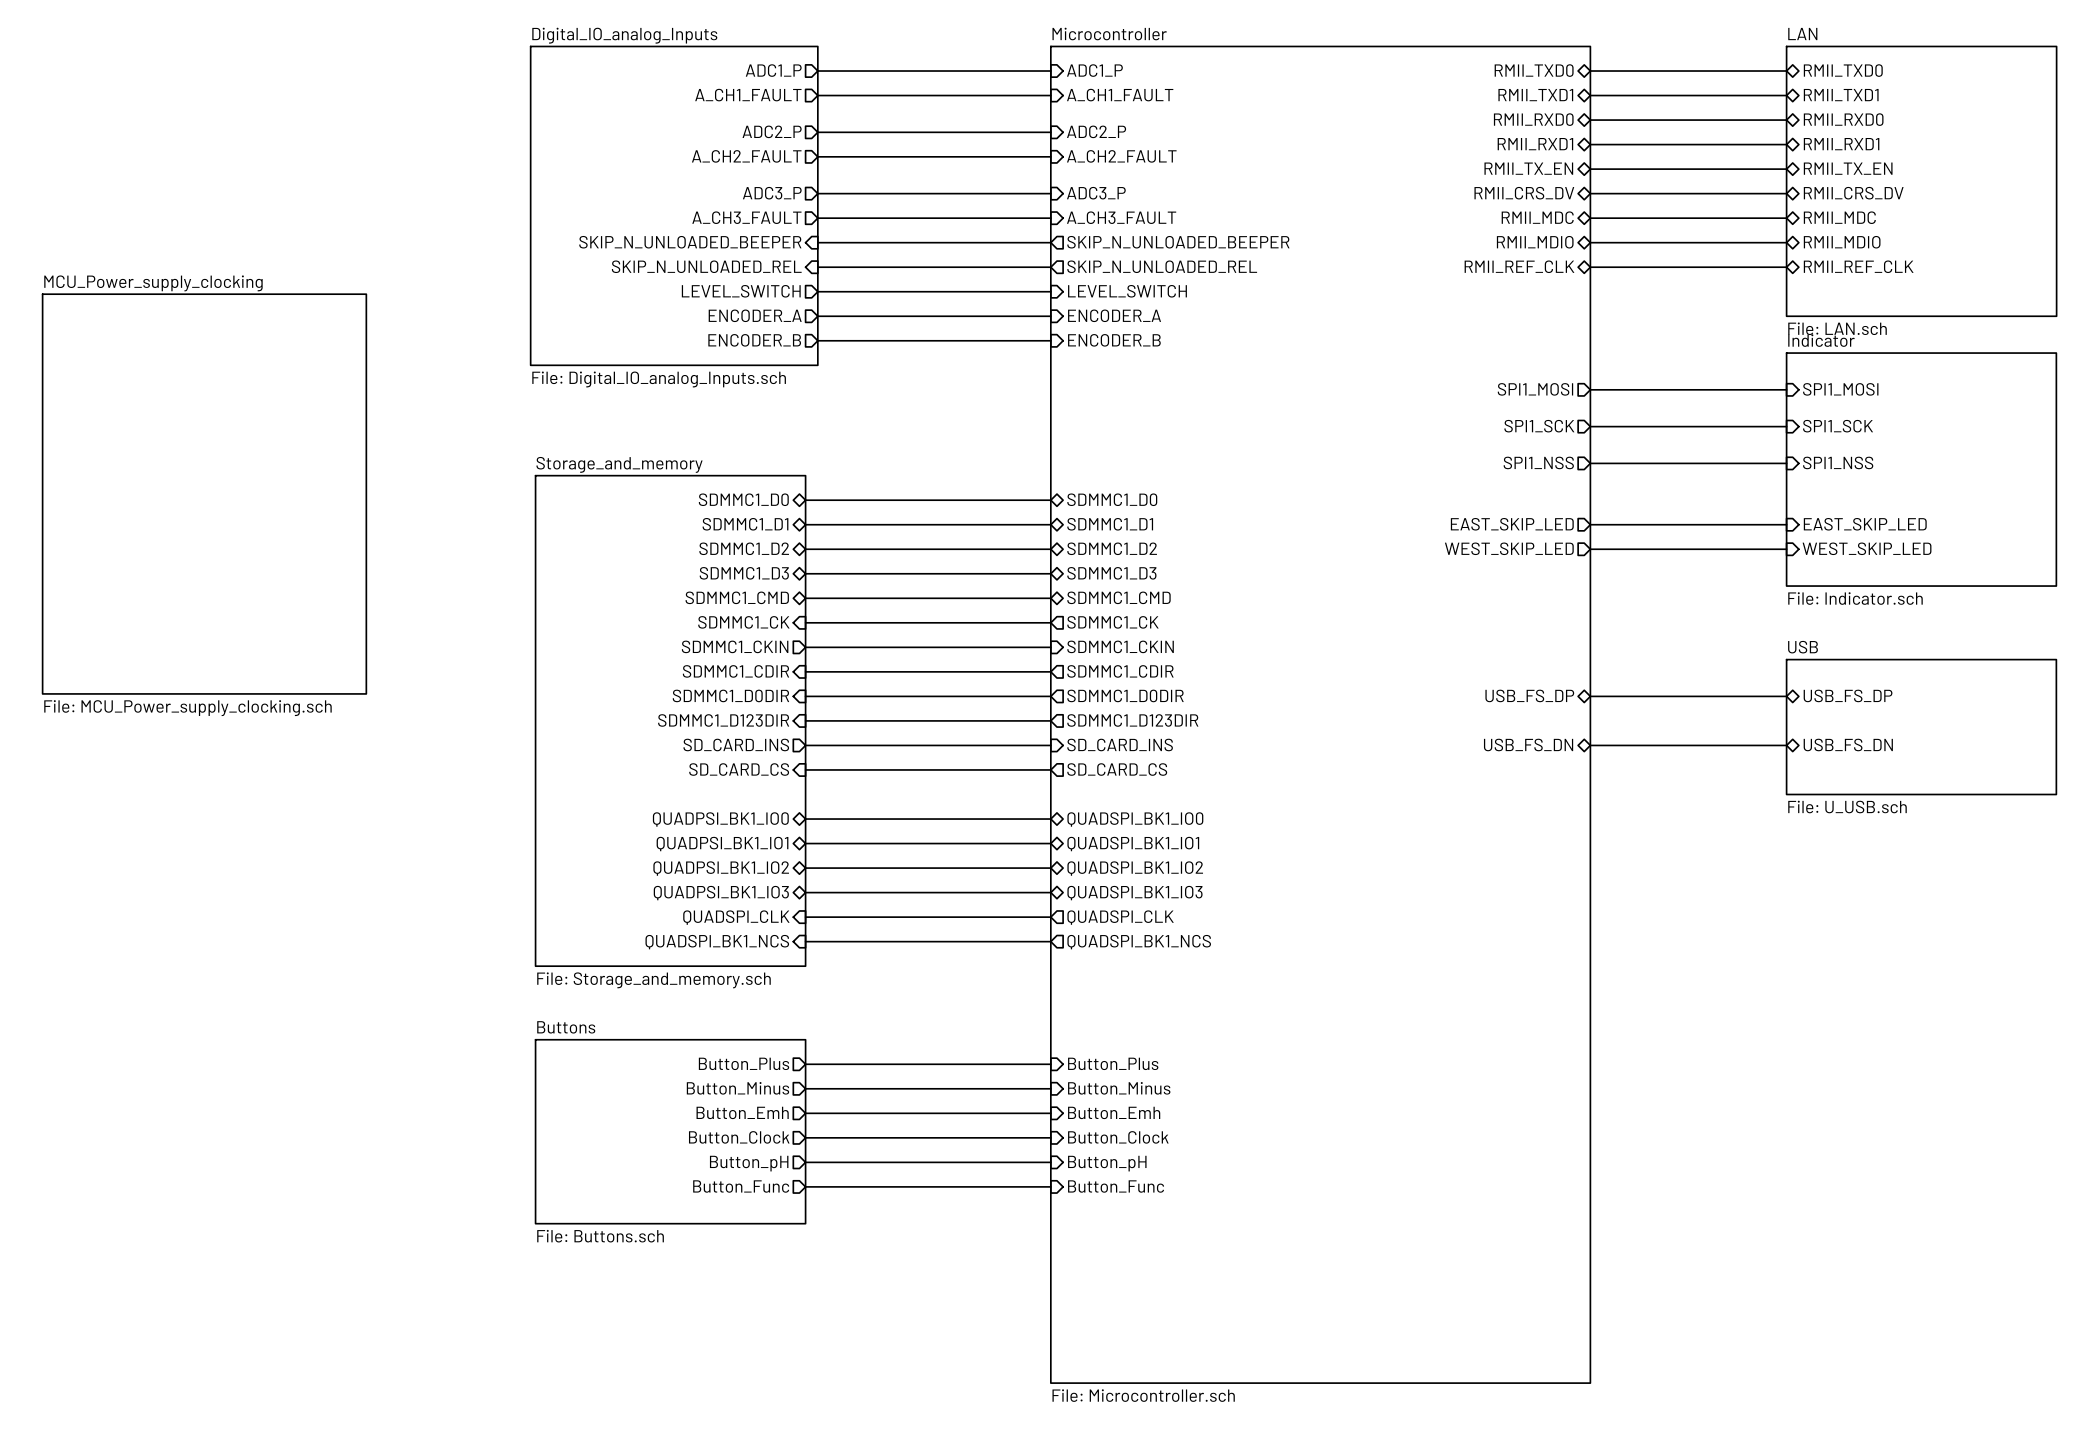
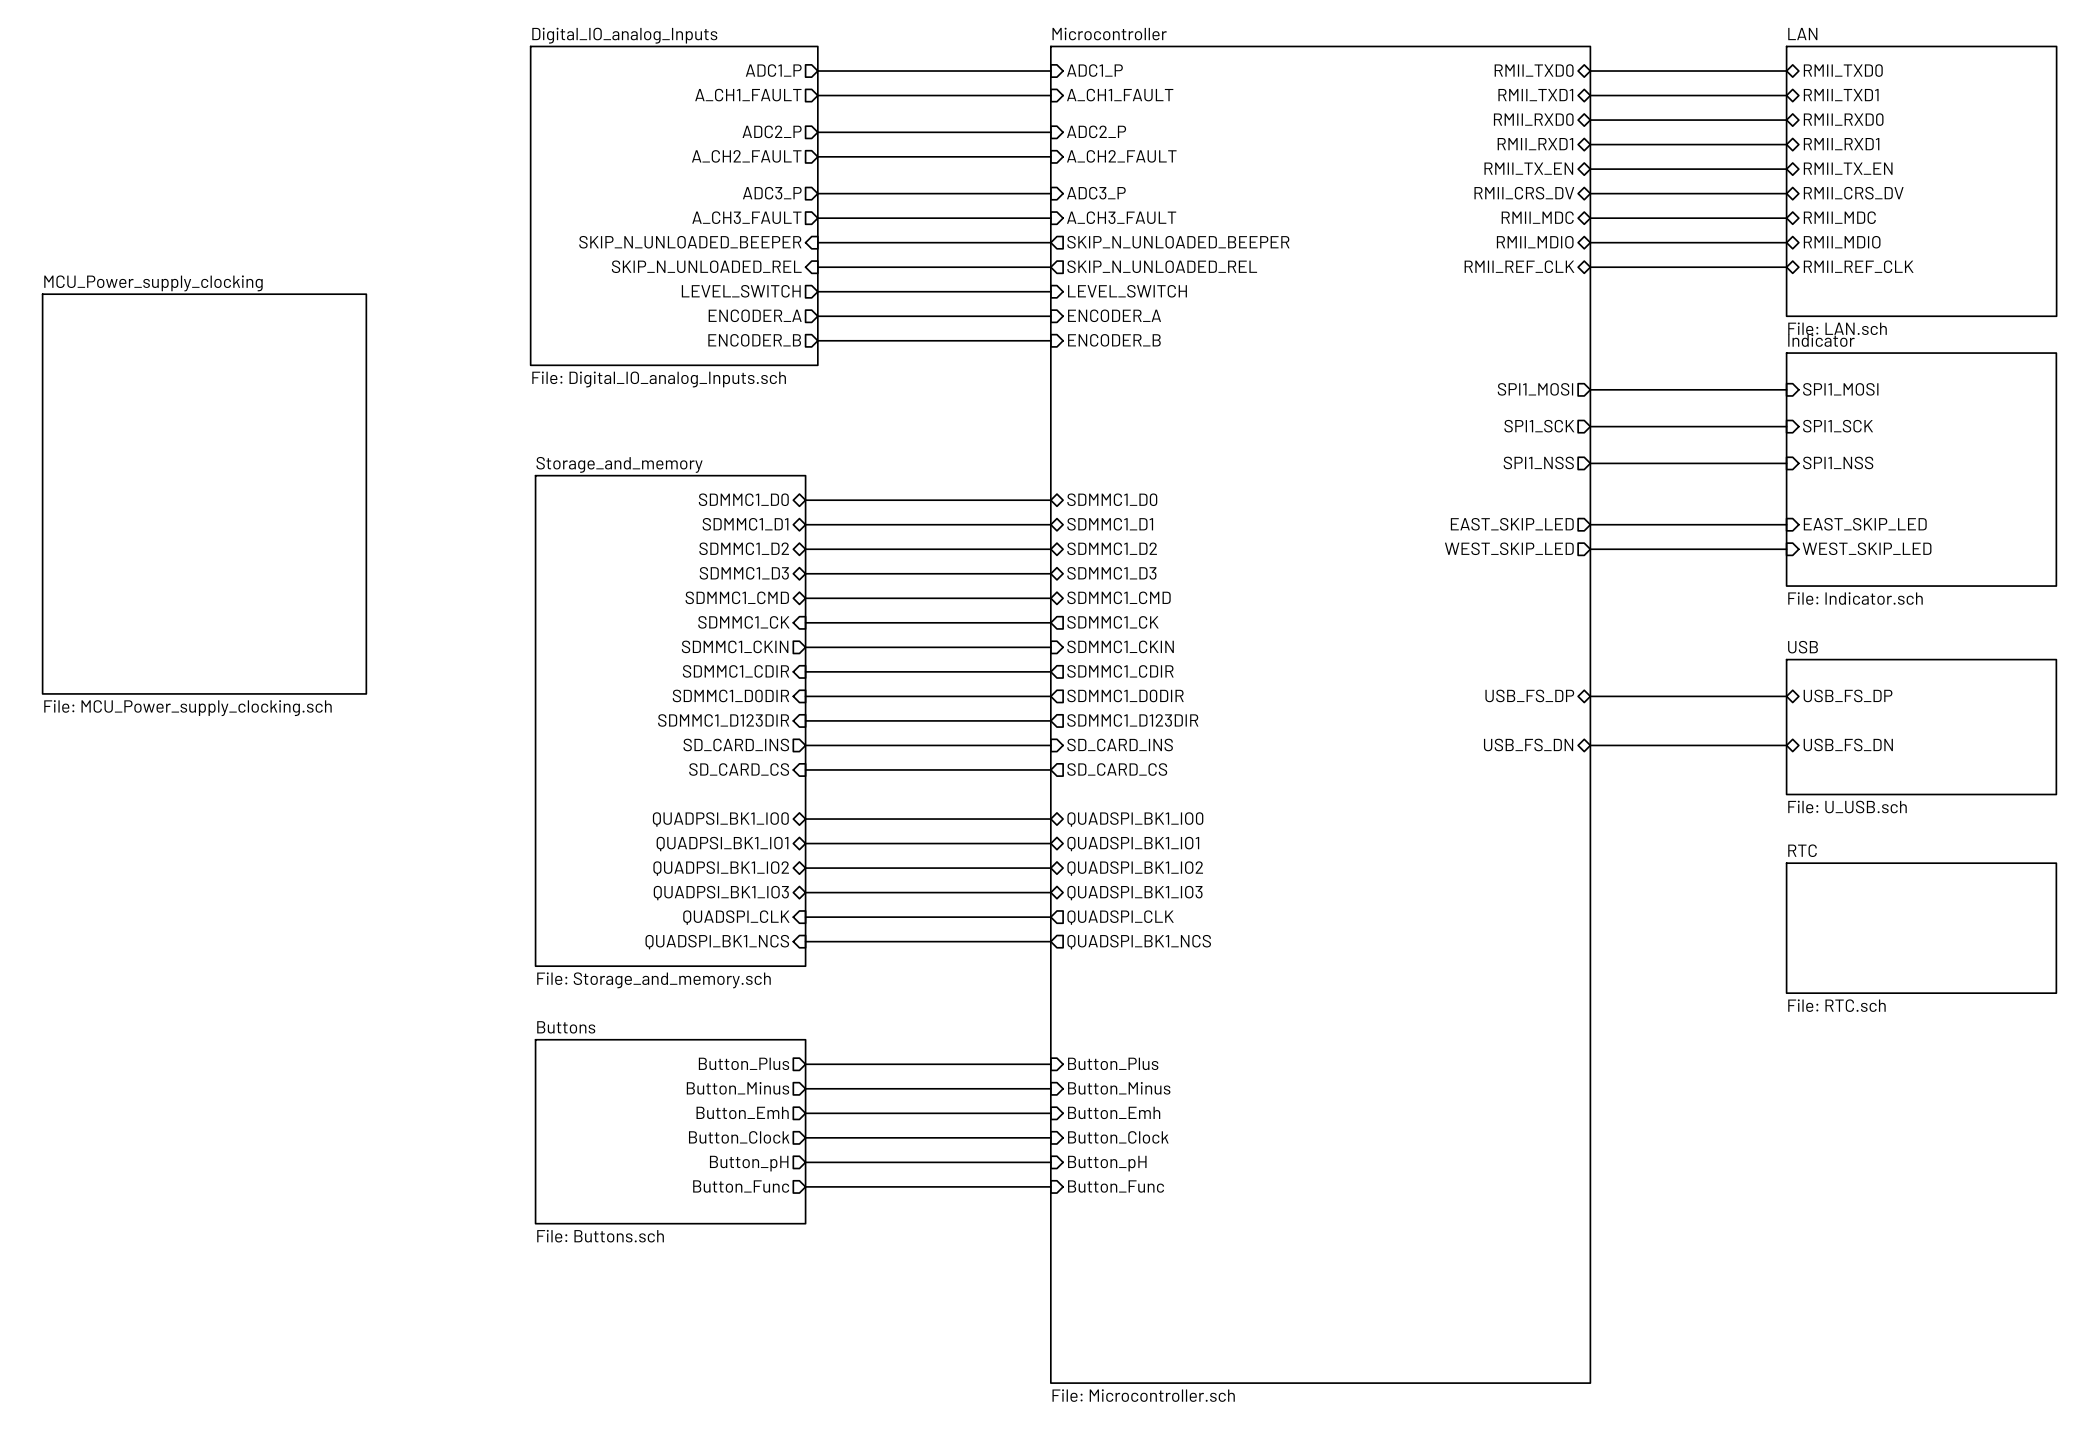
sheet RTC: none -> File: RTC.sch (1921, 928)

